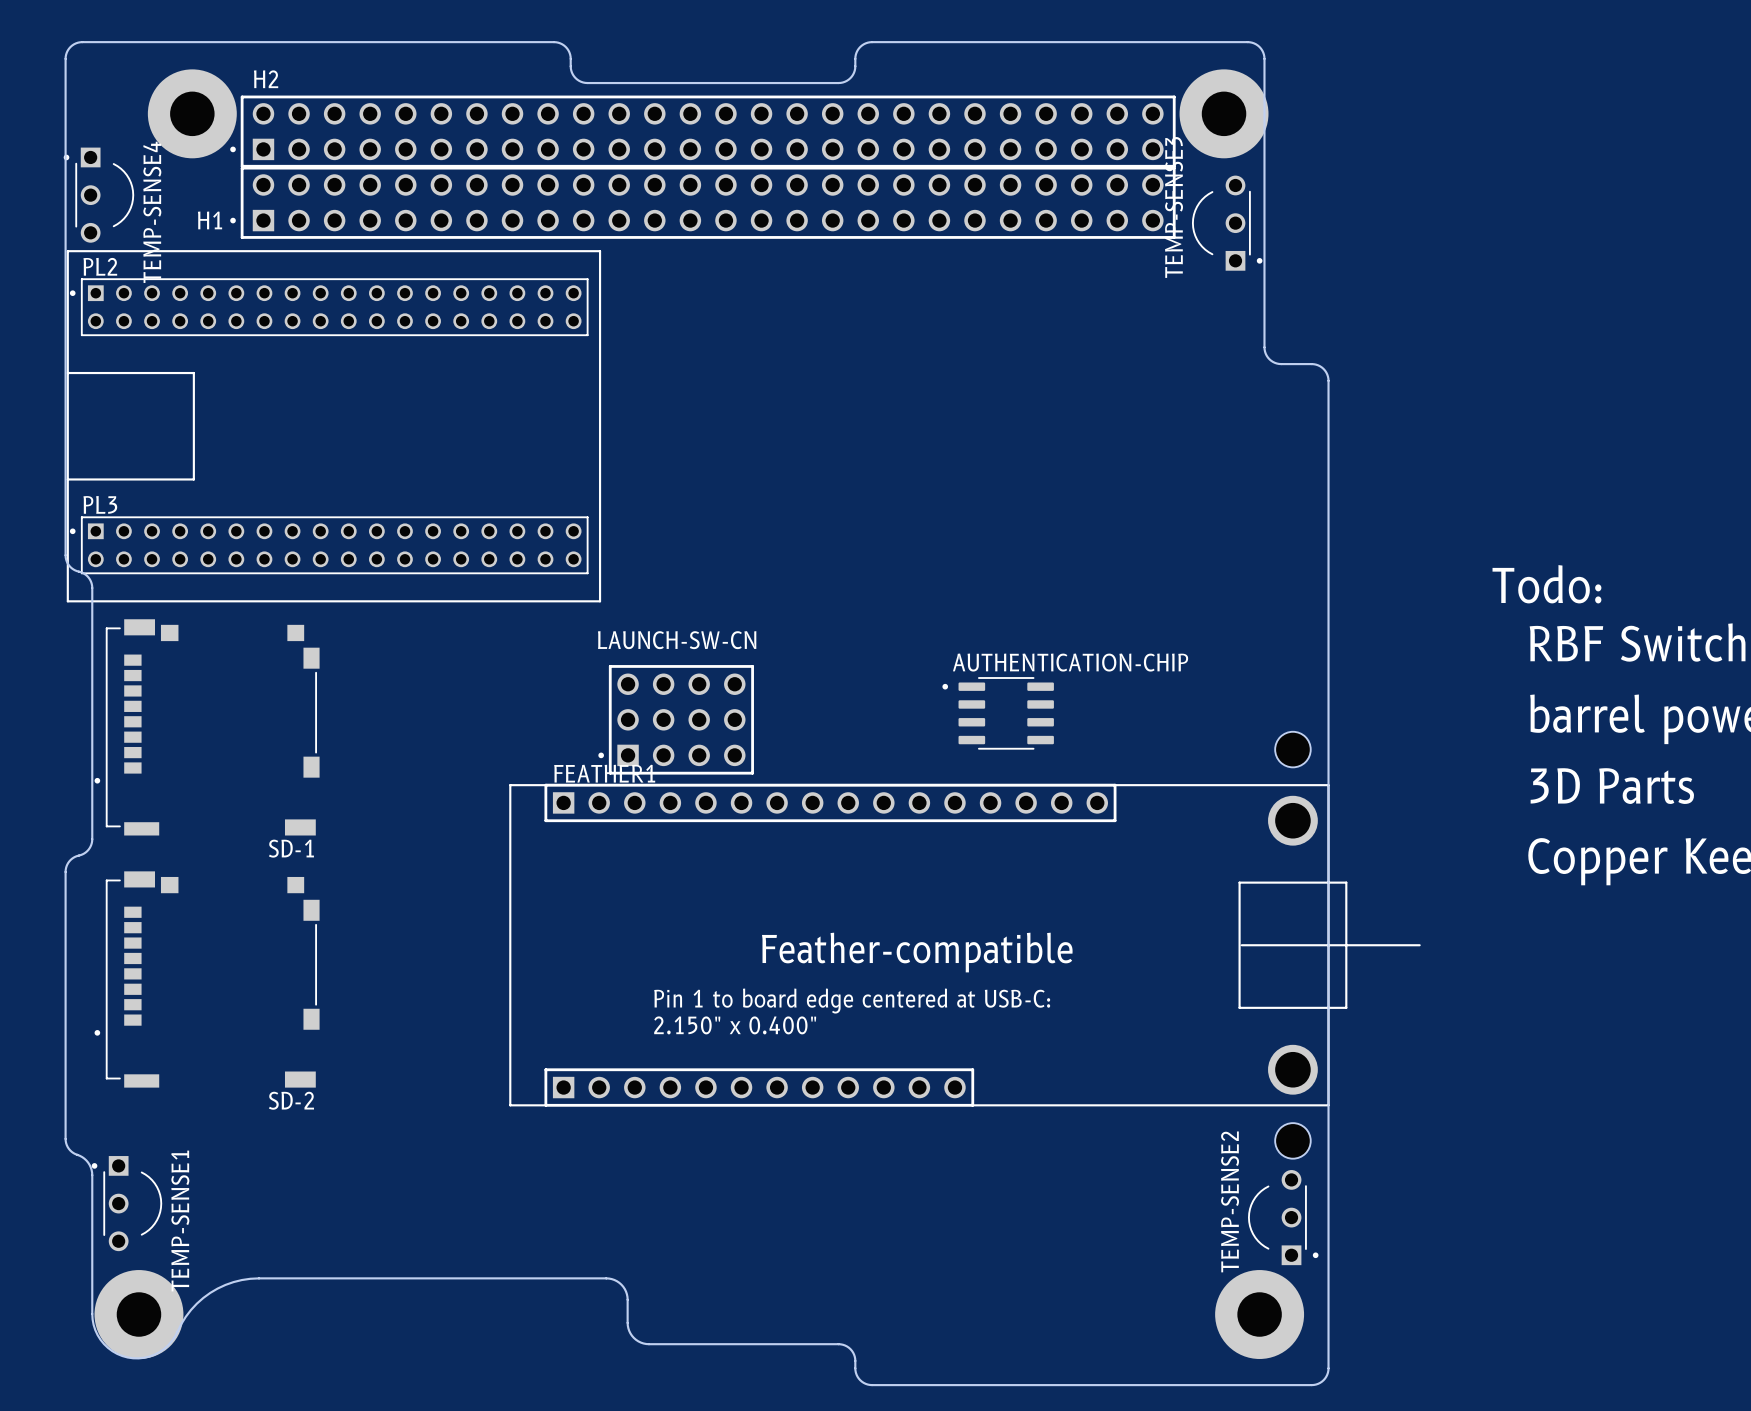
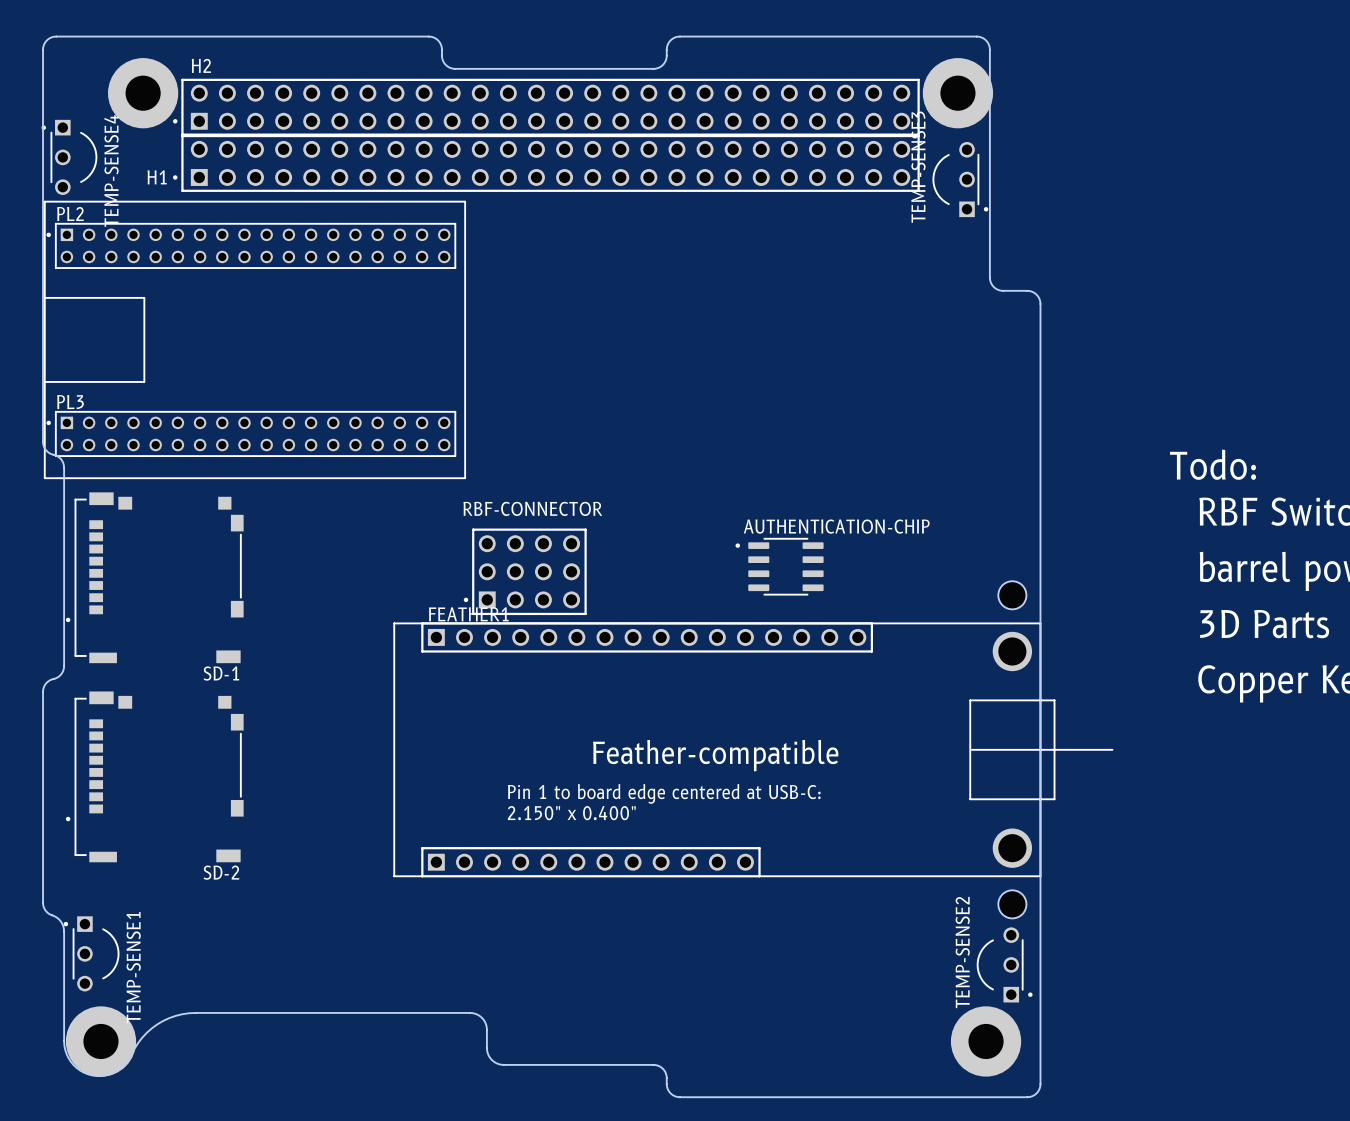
LAUNCH-SW-CN name: LAUNCH-SW-CN (677, 640) -> RBF-CONNECTOR (532, 508)

